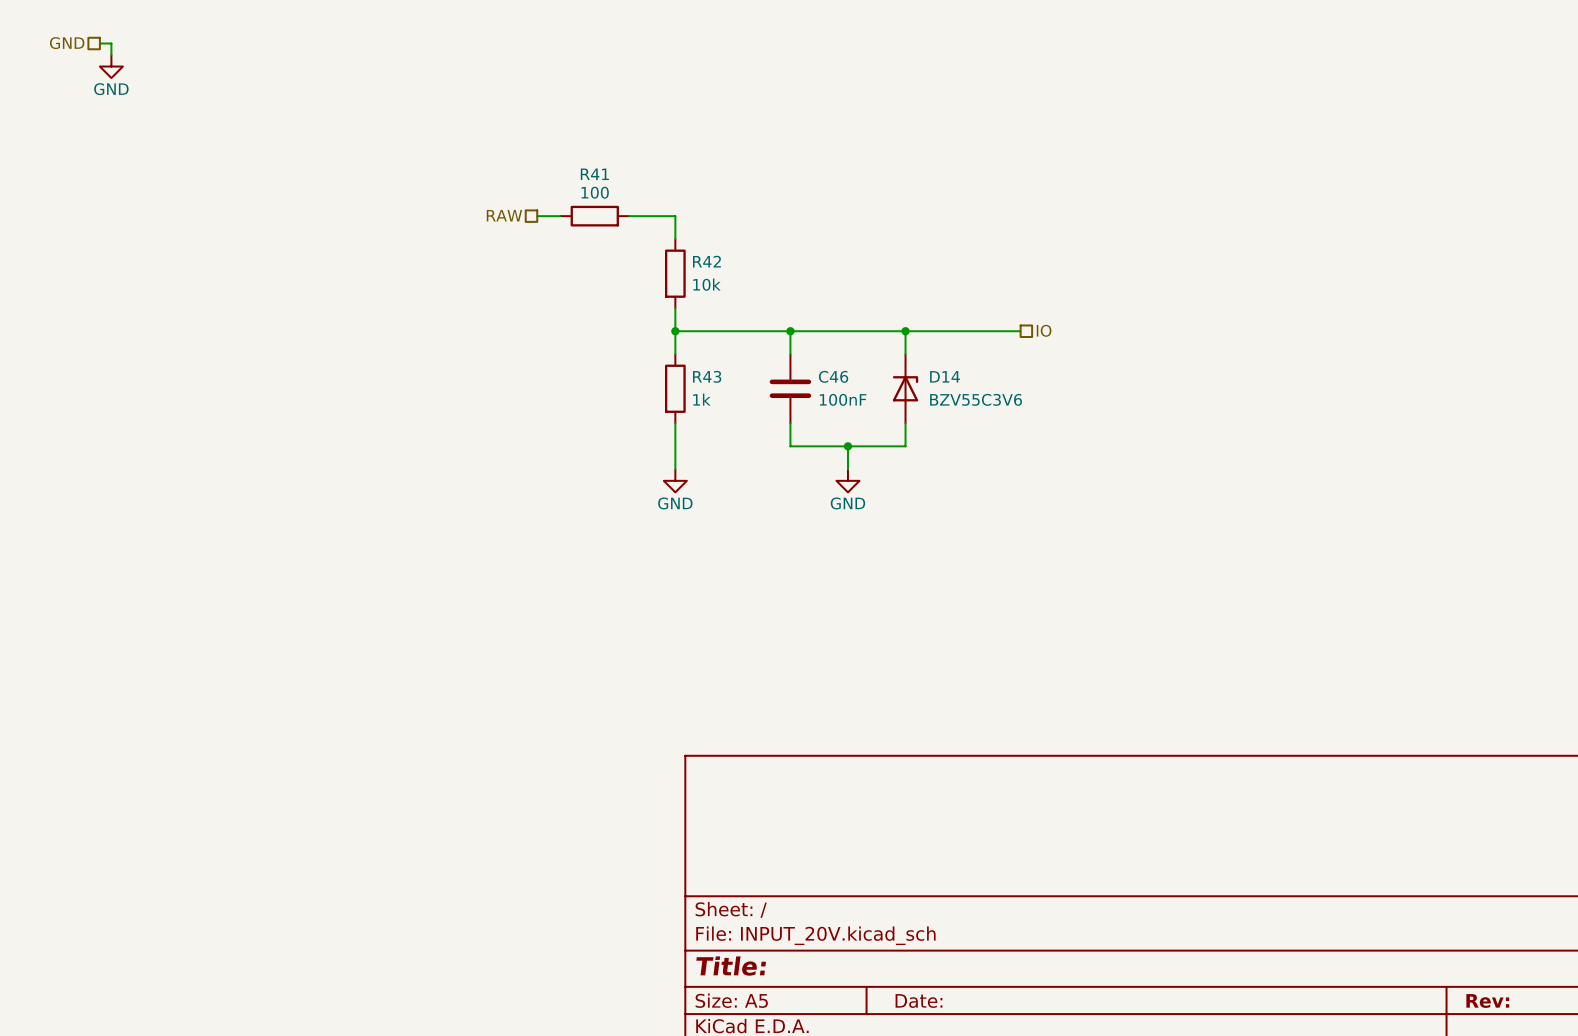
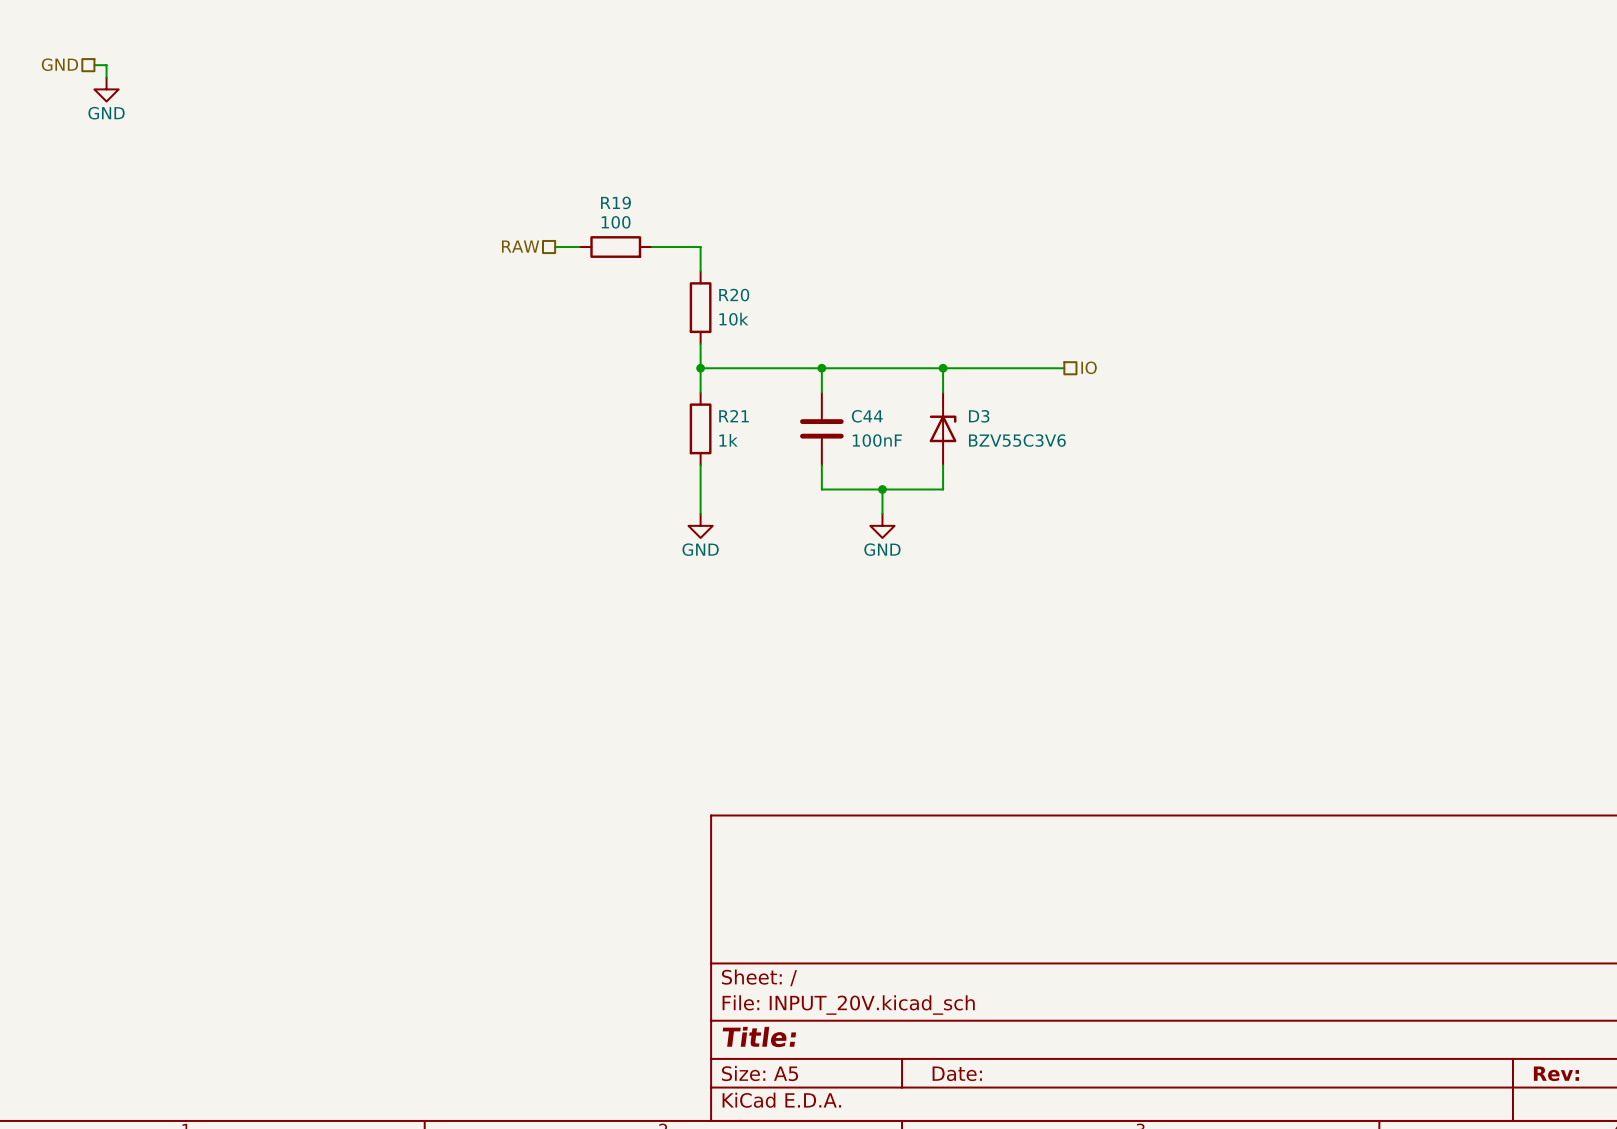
R41 name: R41 (594, 174) -> R19 (615, 202)
R42 name: R42 (706, 261) -> R20 (734, 295)
R43 name: R43 (707, 376) -> R21 (733, 416)
C46 name: C46 (833, 376) -> C44 (867, 416)
D14 name: D14 (945, 376) -> D3 (979, 416)

